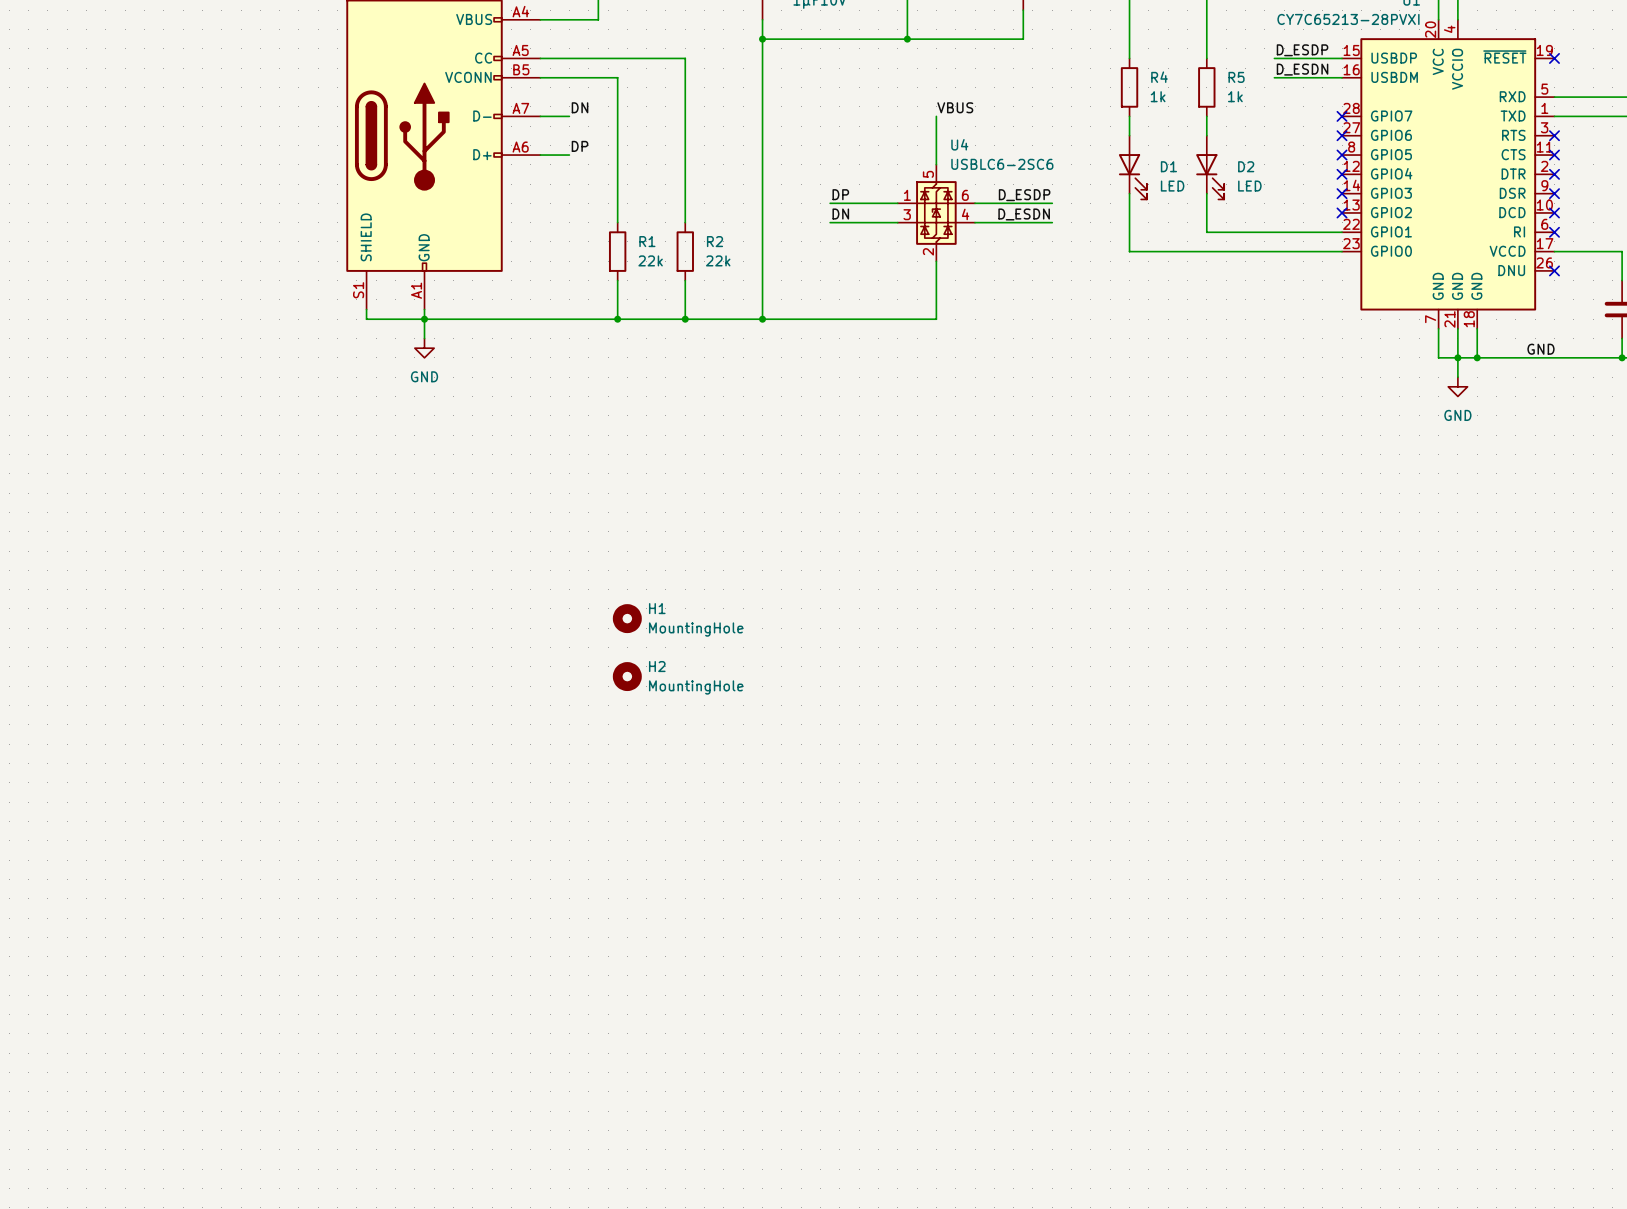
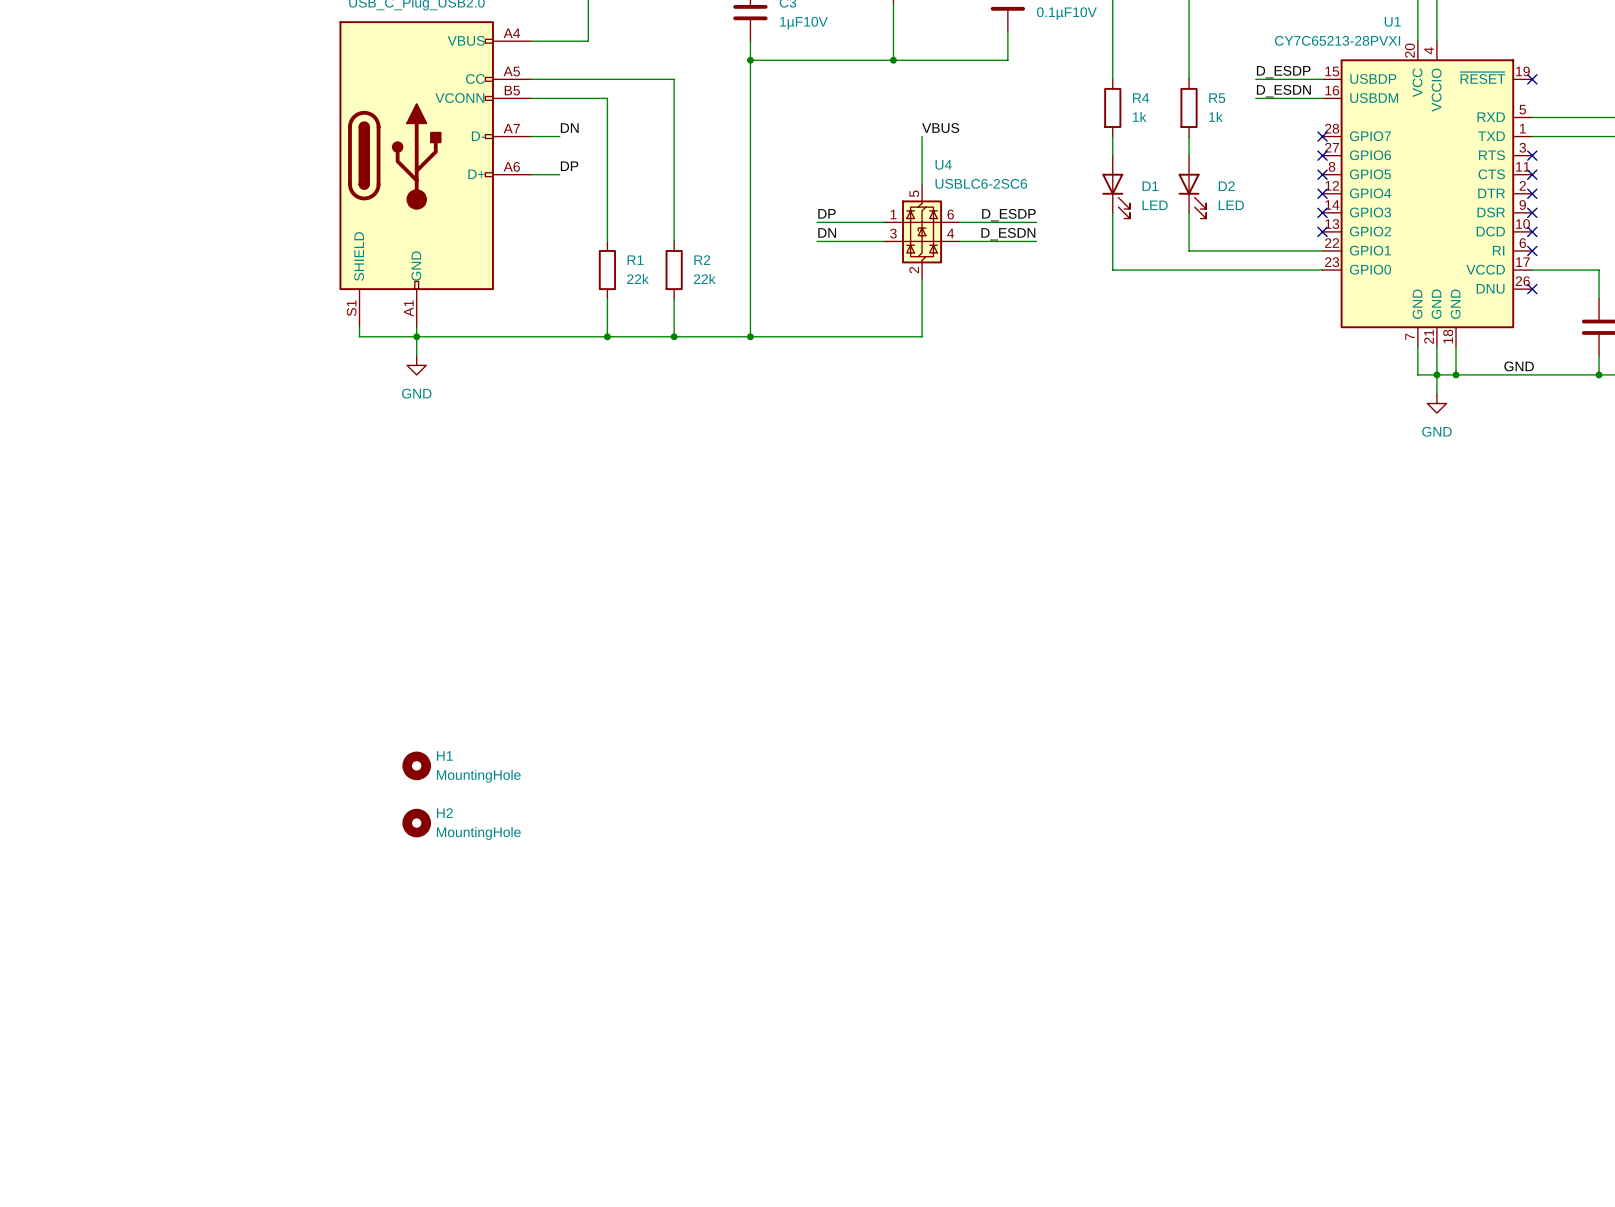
H1 position: (627, 618) -> (416, 765)
H2 position: (627, 676) -> (416, 823)

